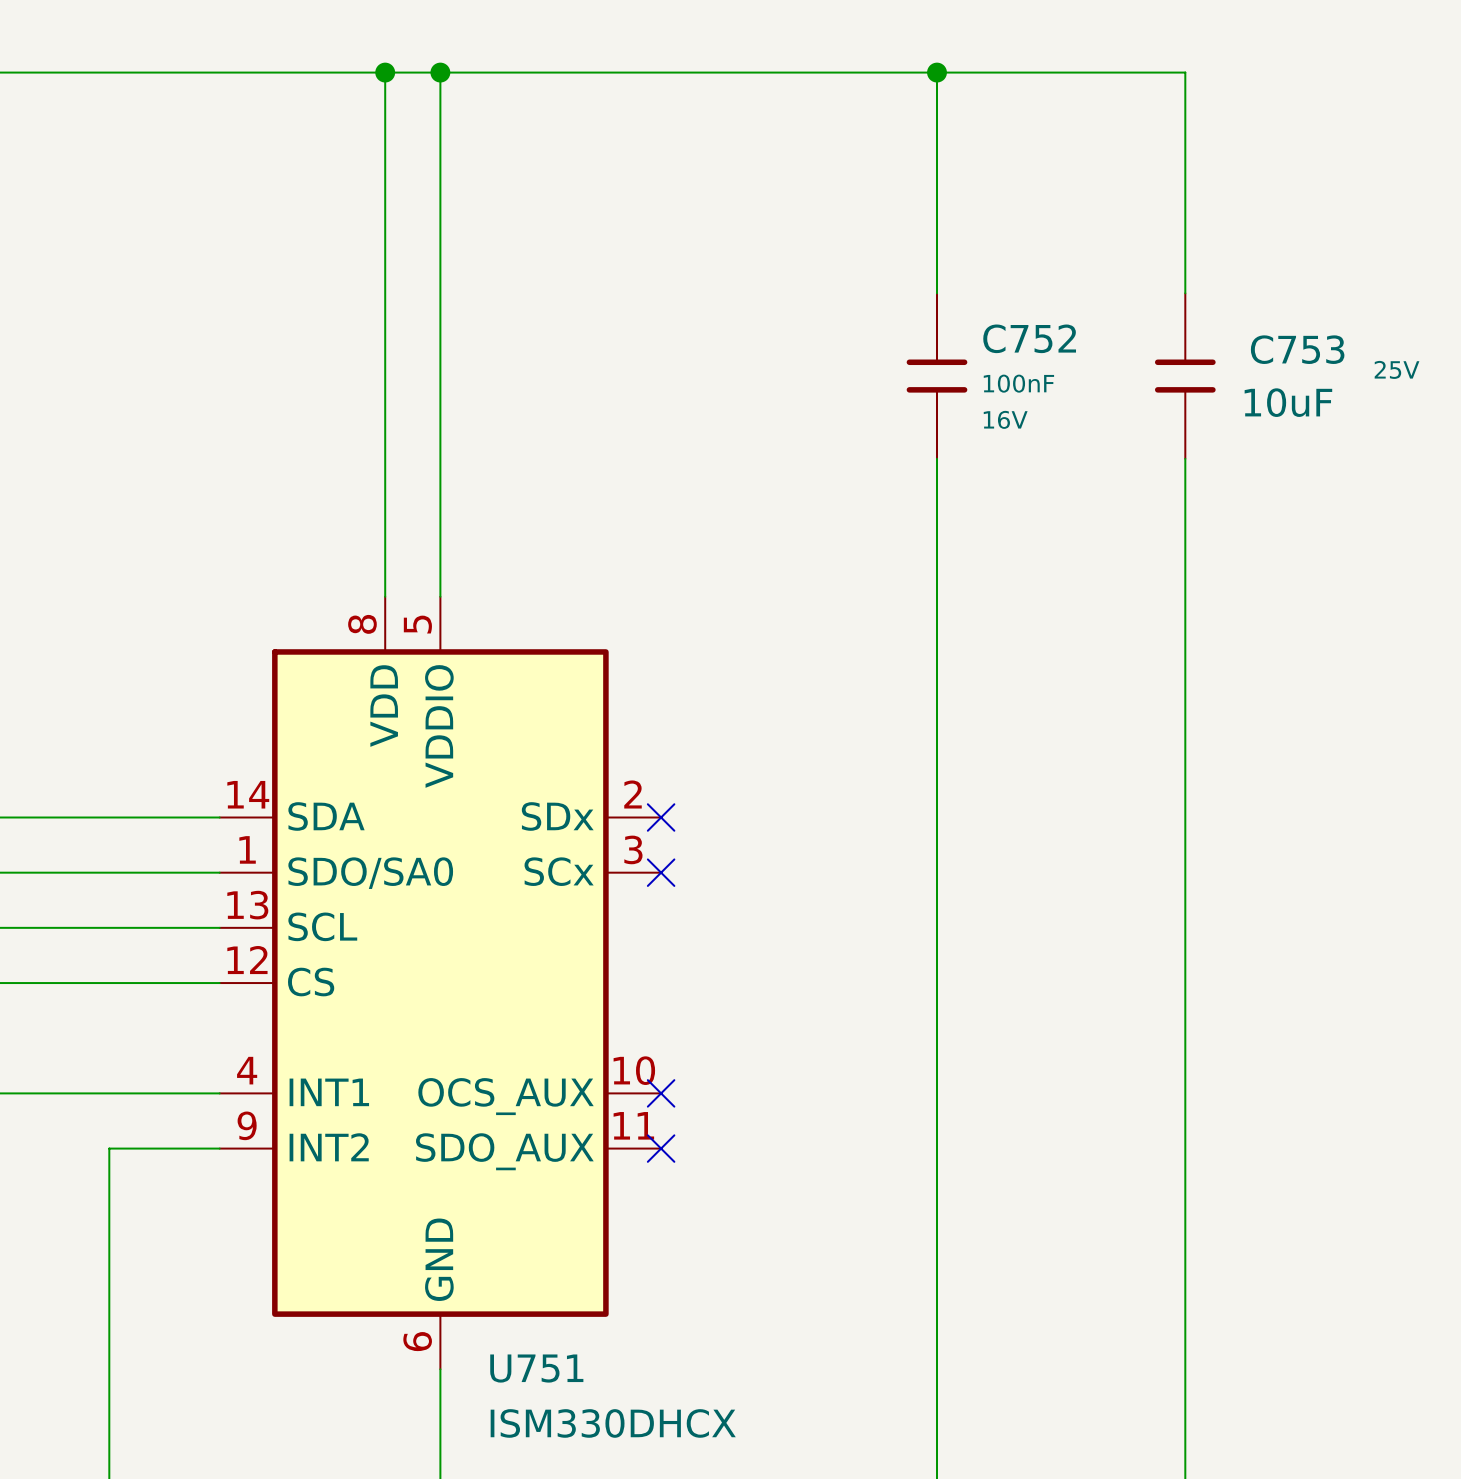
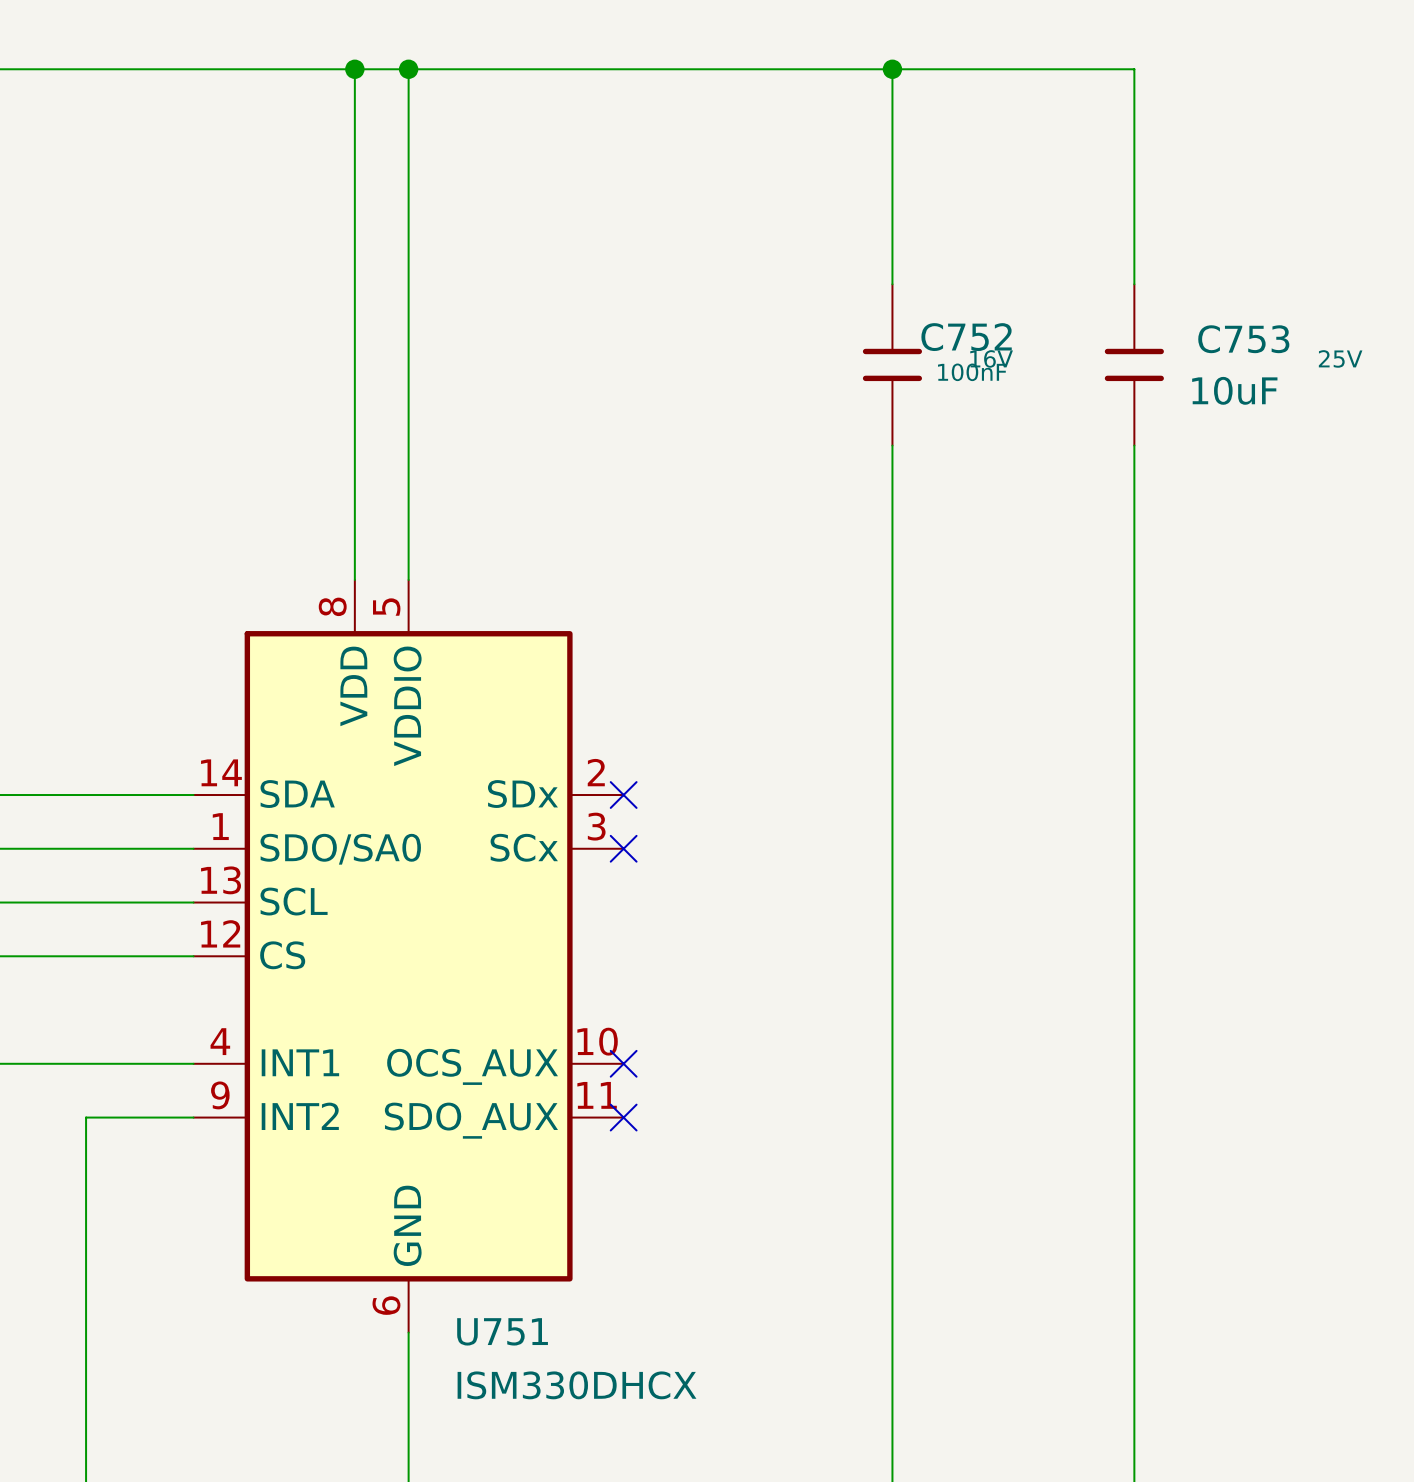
C752 name position: C752 (1029, 338) -> C752 (966, 337)
C752 text position: 16V (1005, 419) -> 16V (991, 358)

